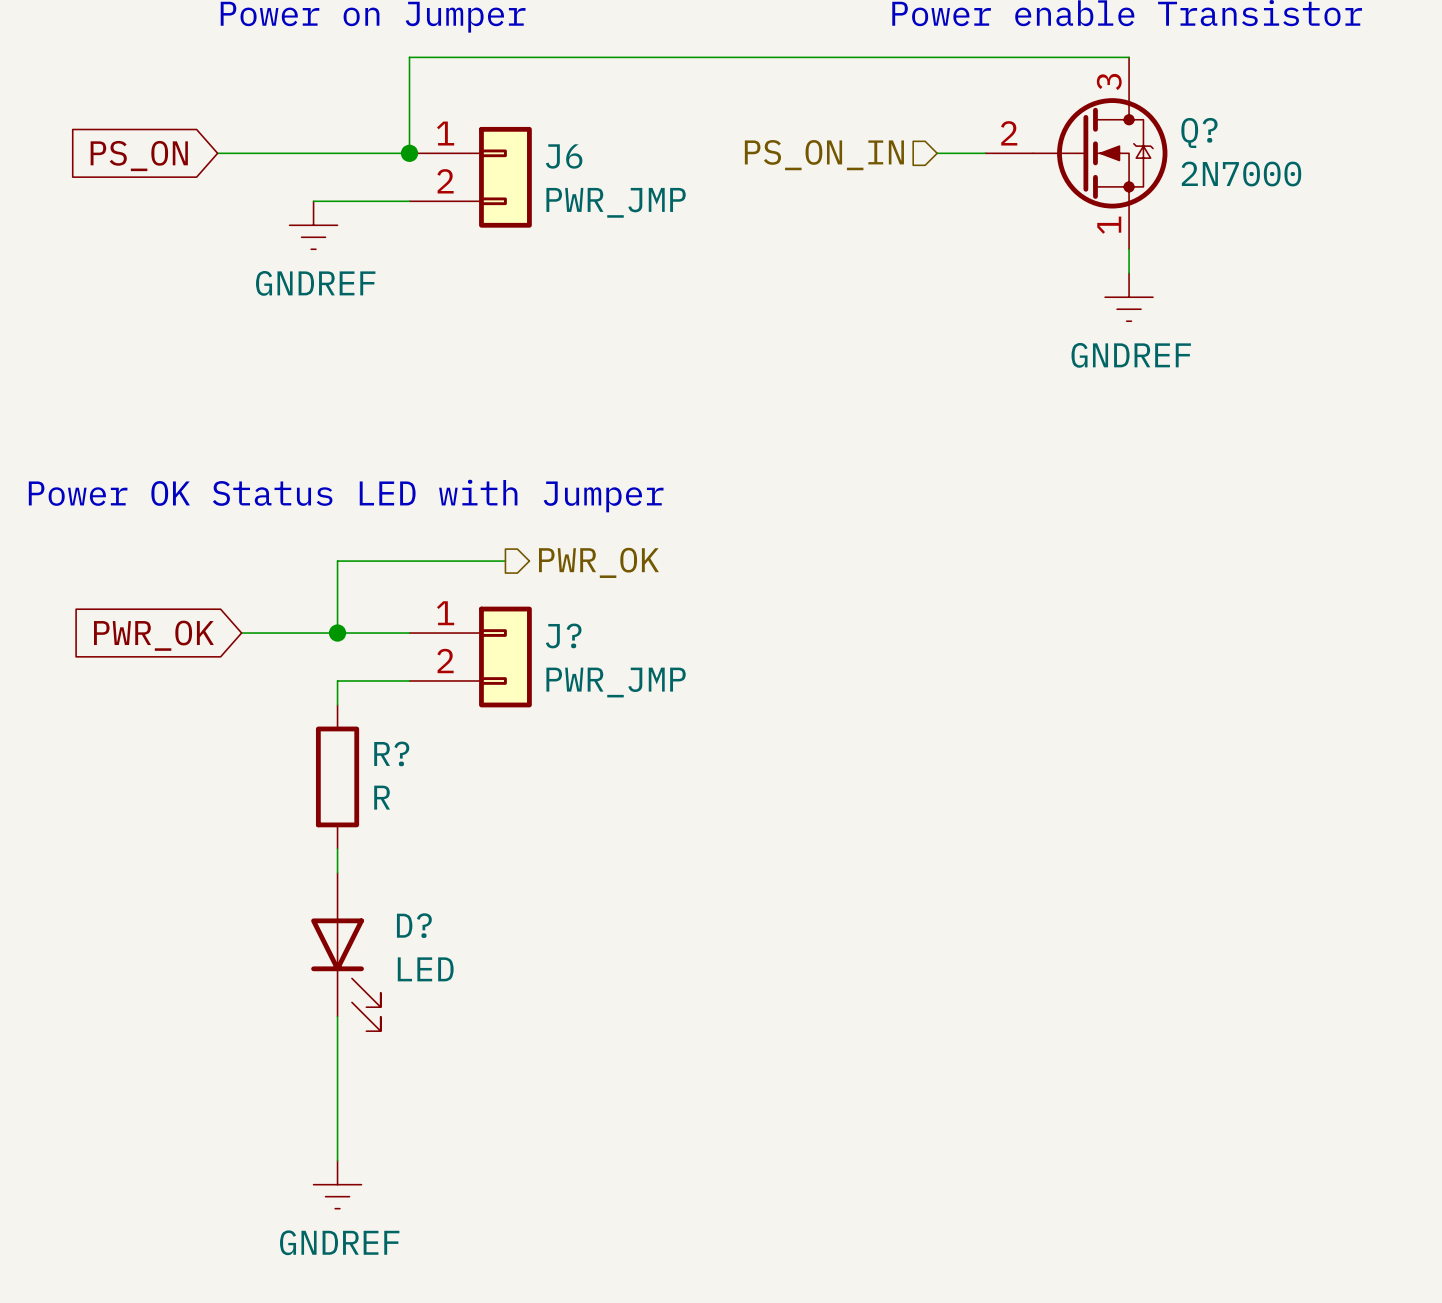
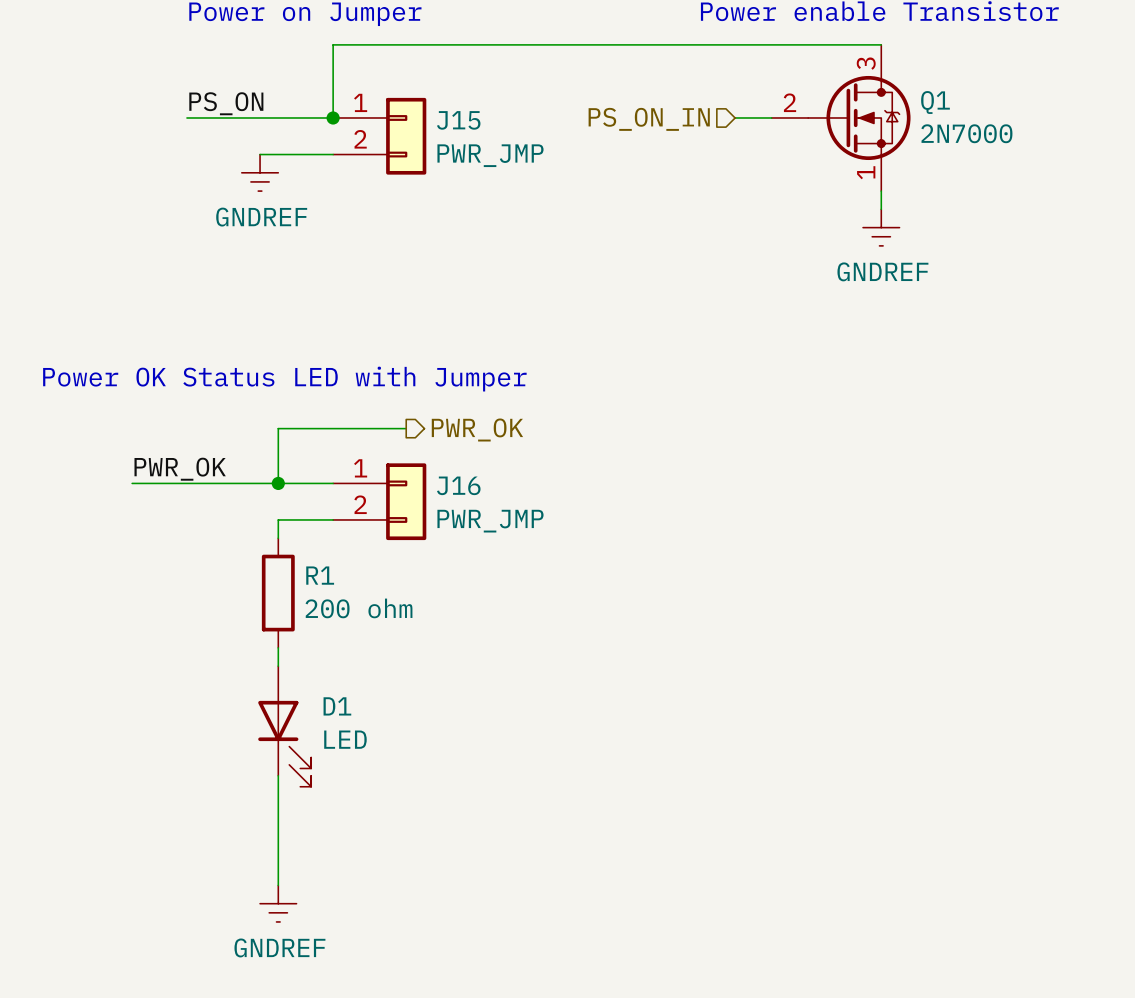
Q? name: Q? (1199, 132) -> Q1 (935, 102)
label: none -> PS_ON (226, 103)
global label: PS_ON (139, 156) -> none
J6 name: J6 (564, 156) -> J15 (458, 120)
label: none -> PWR_OK (180, 469)
wire: none -> (132, 483) (205, 483)
global label: PWR_OK (153, 635) -> none
J? name: J? (563, 635) -> J16 (458, 485)
R? name: R? (391, 753) -> R1 (320, 575)
R? value: R (382, 797) -> 200 ohm (359, 608)
D? name: D? (414, 925) -> D1 (337, 706)

